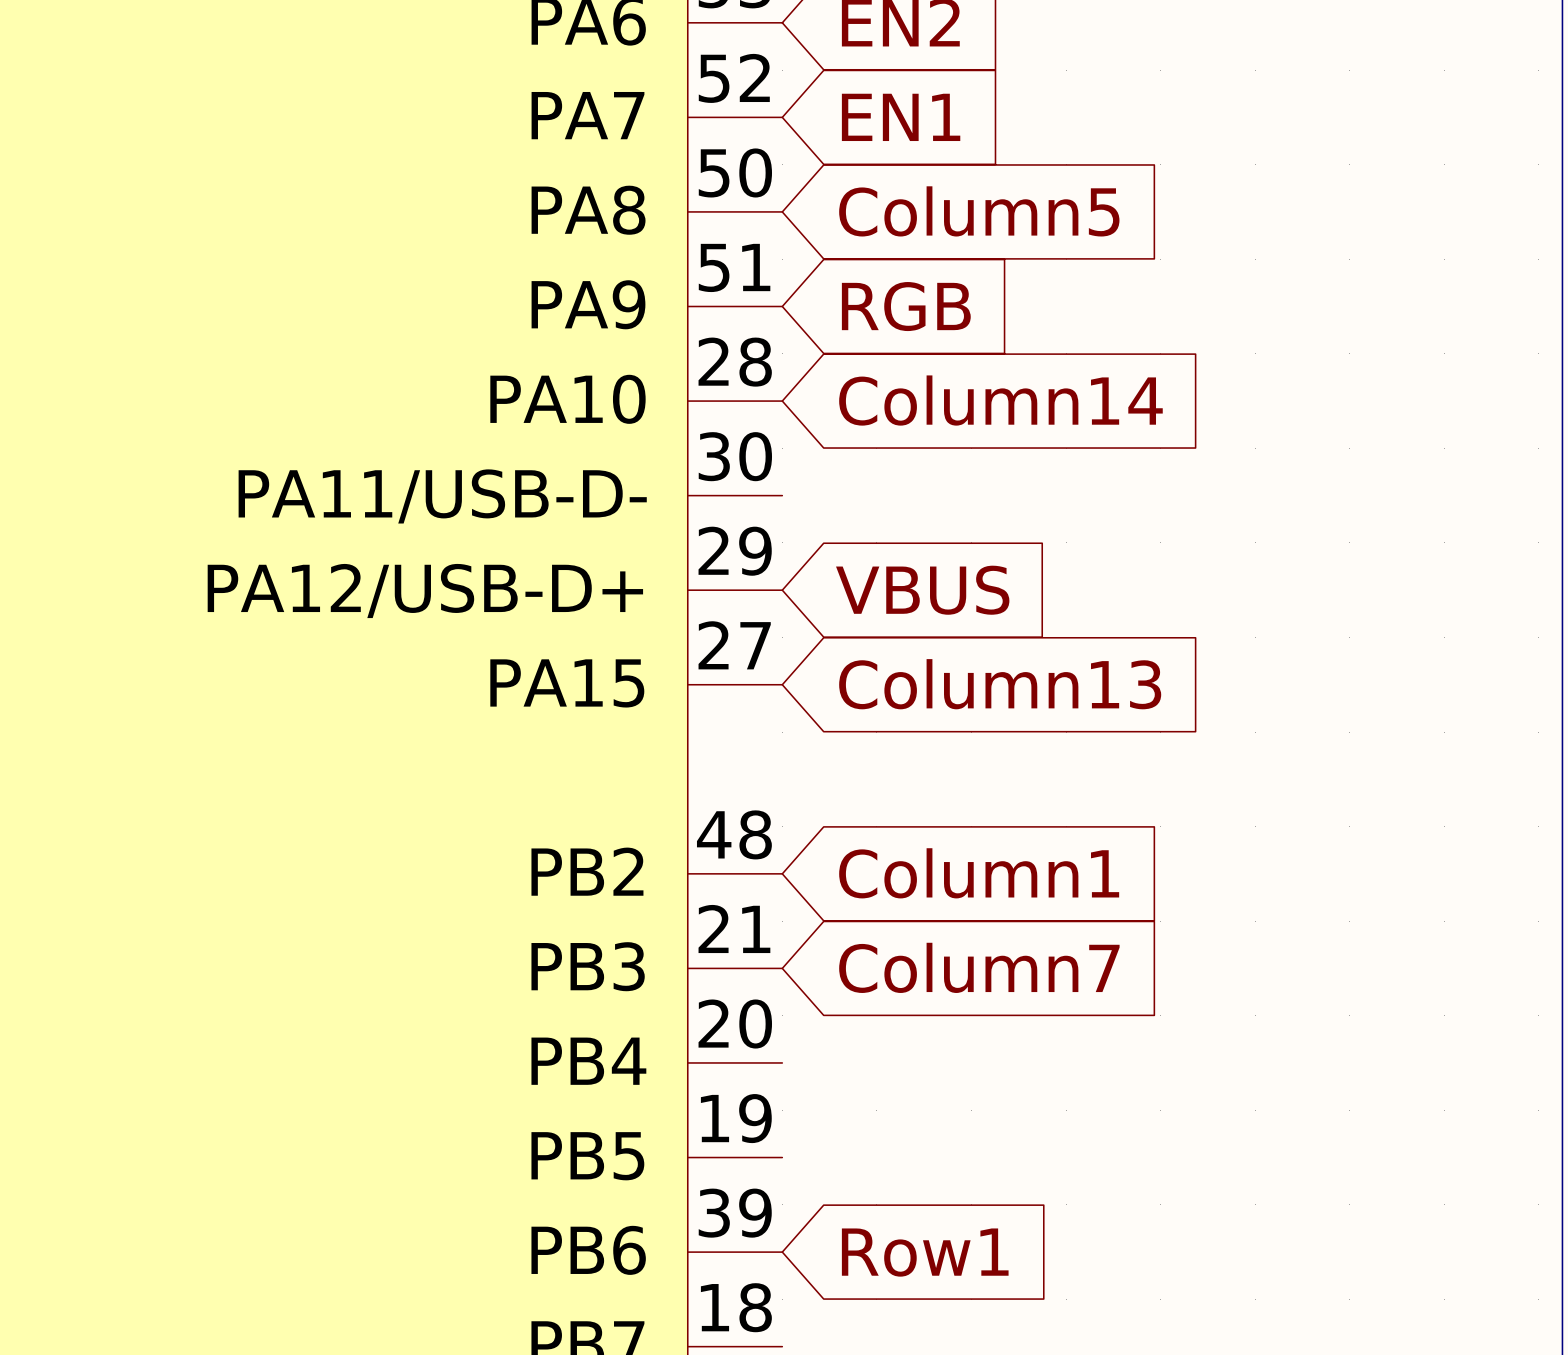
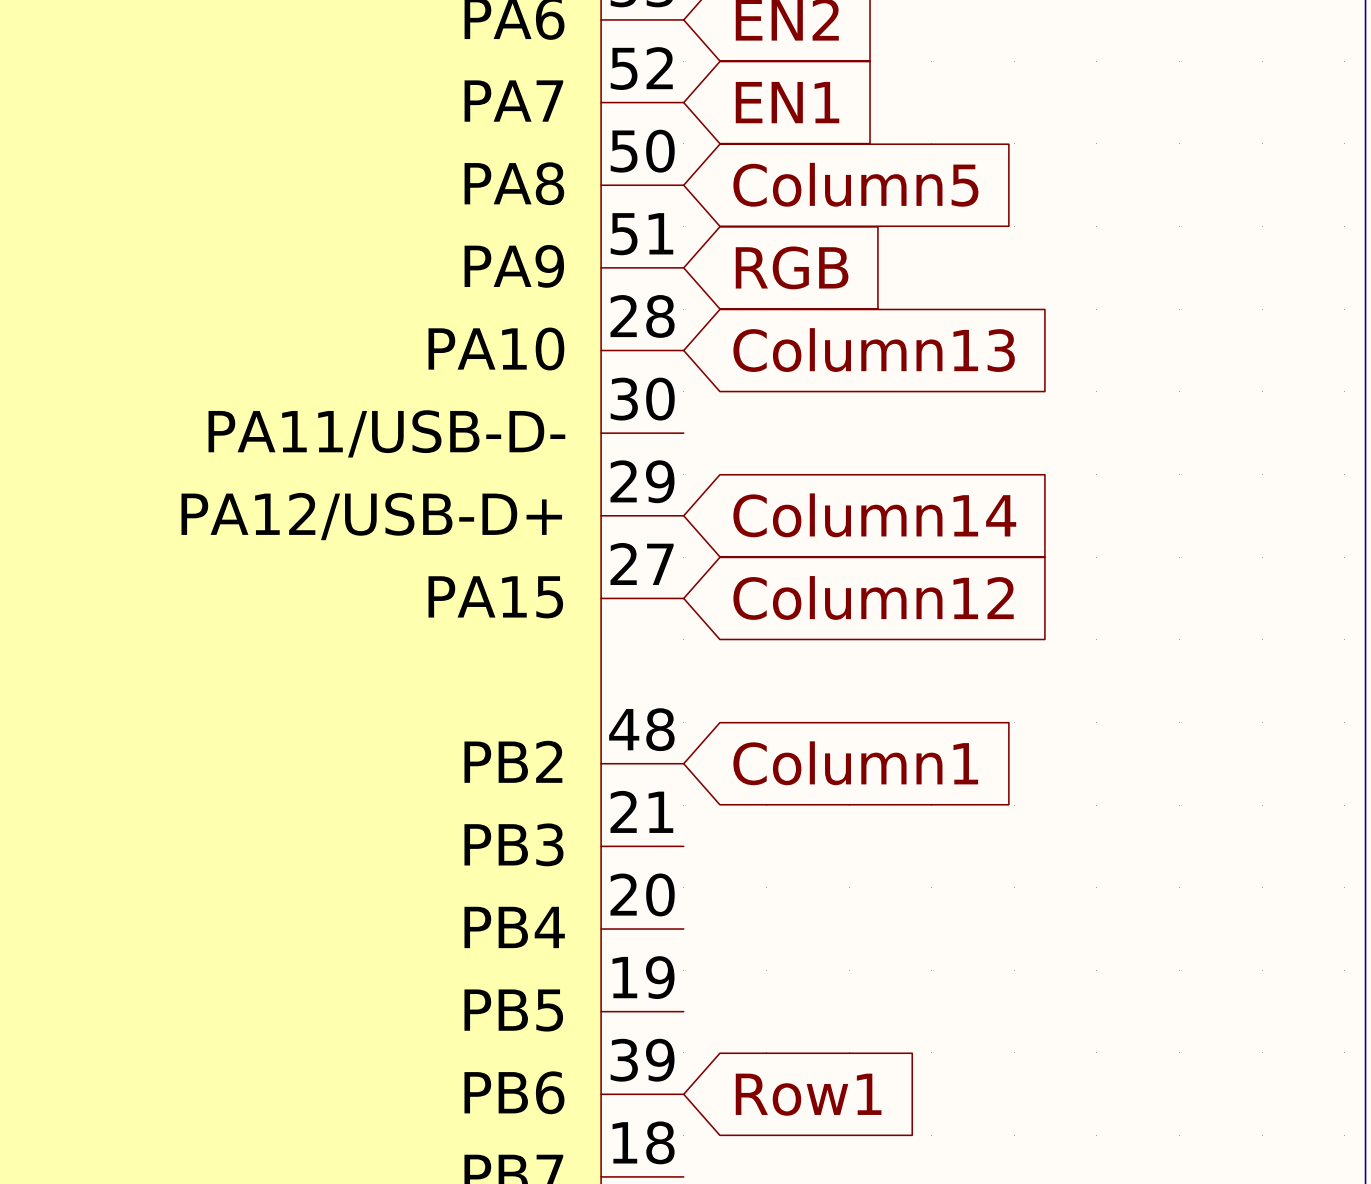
global label: Column14 (1000, 400) -> Column13 (874, 350)
global label: VBUS (922, 590) -> Column14 (874, 515)
global label: Column13 (1000, 684) -> Column12 (873, 597)
global label: Column7 (979, 967) -> none

